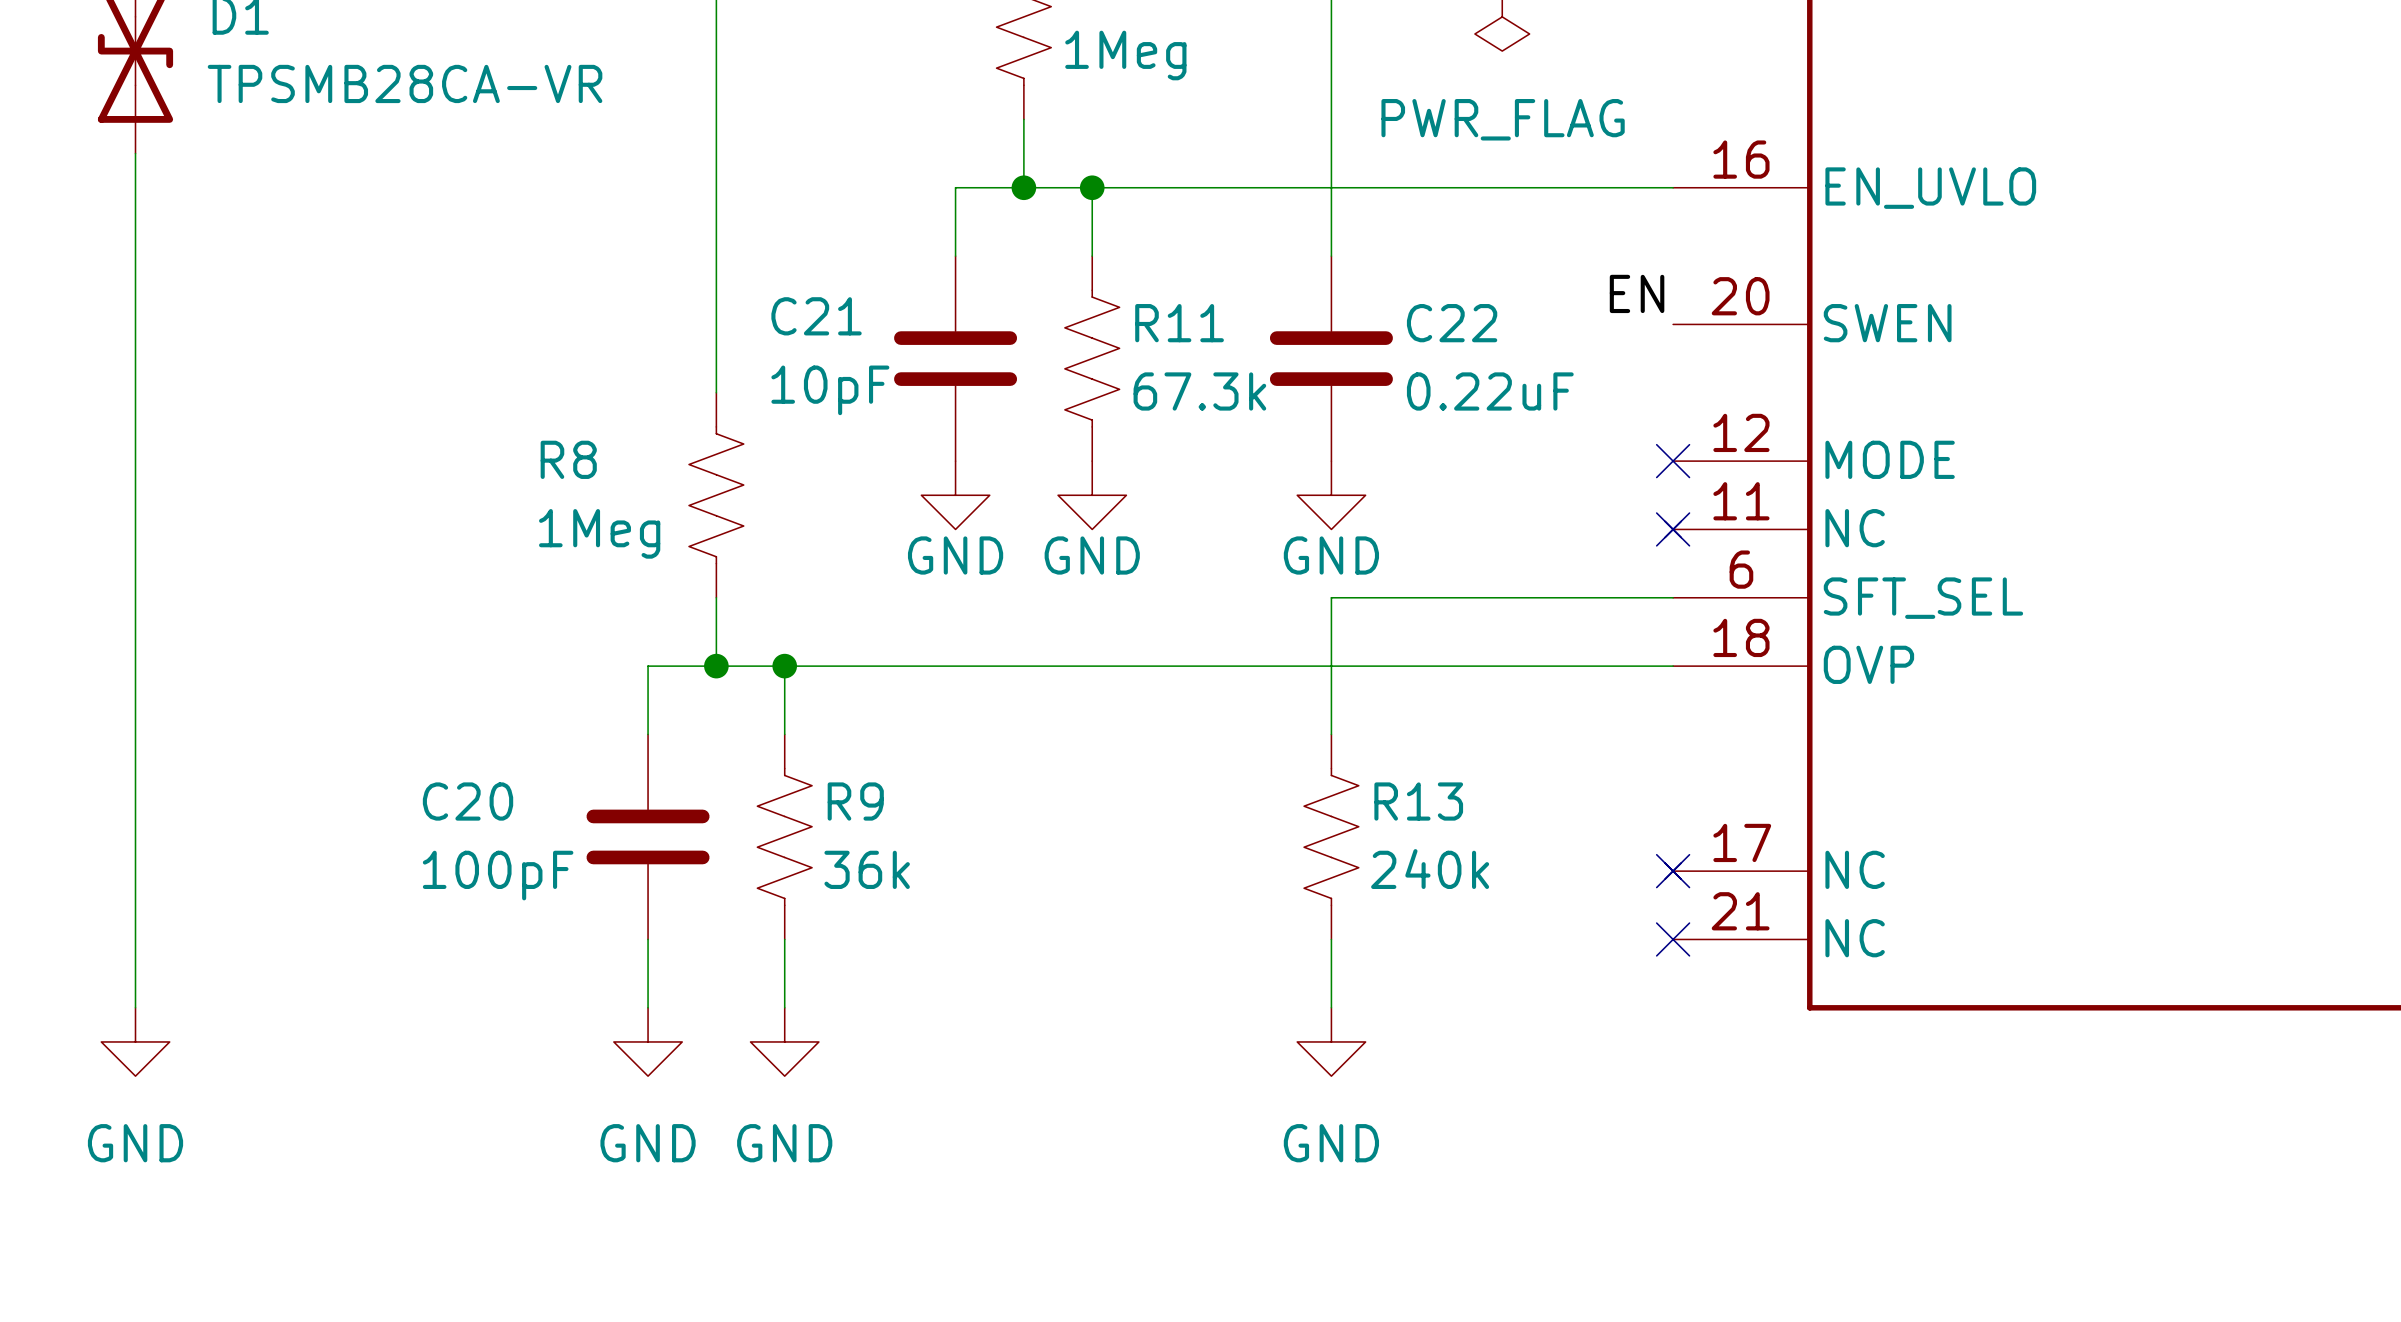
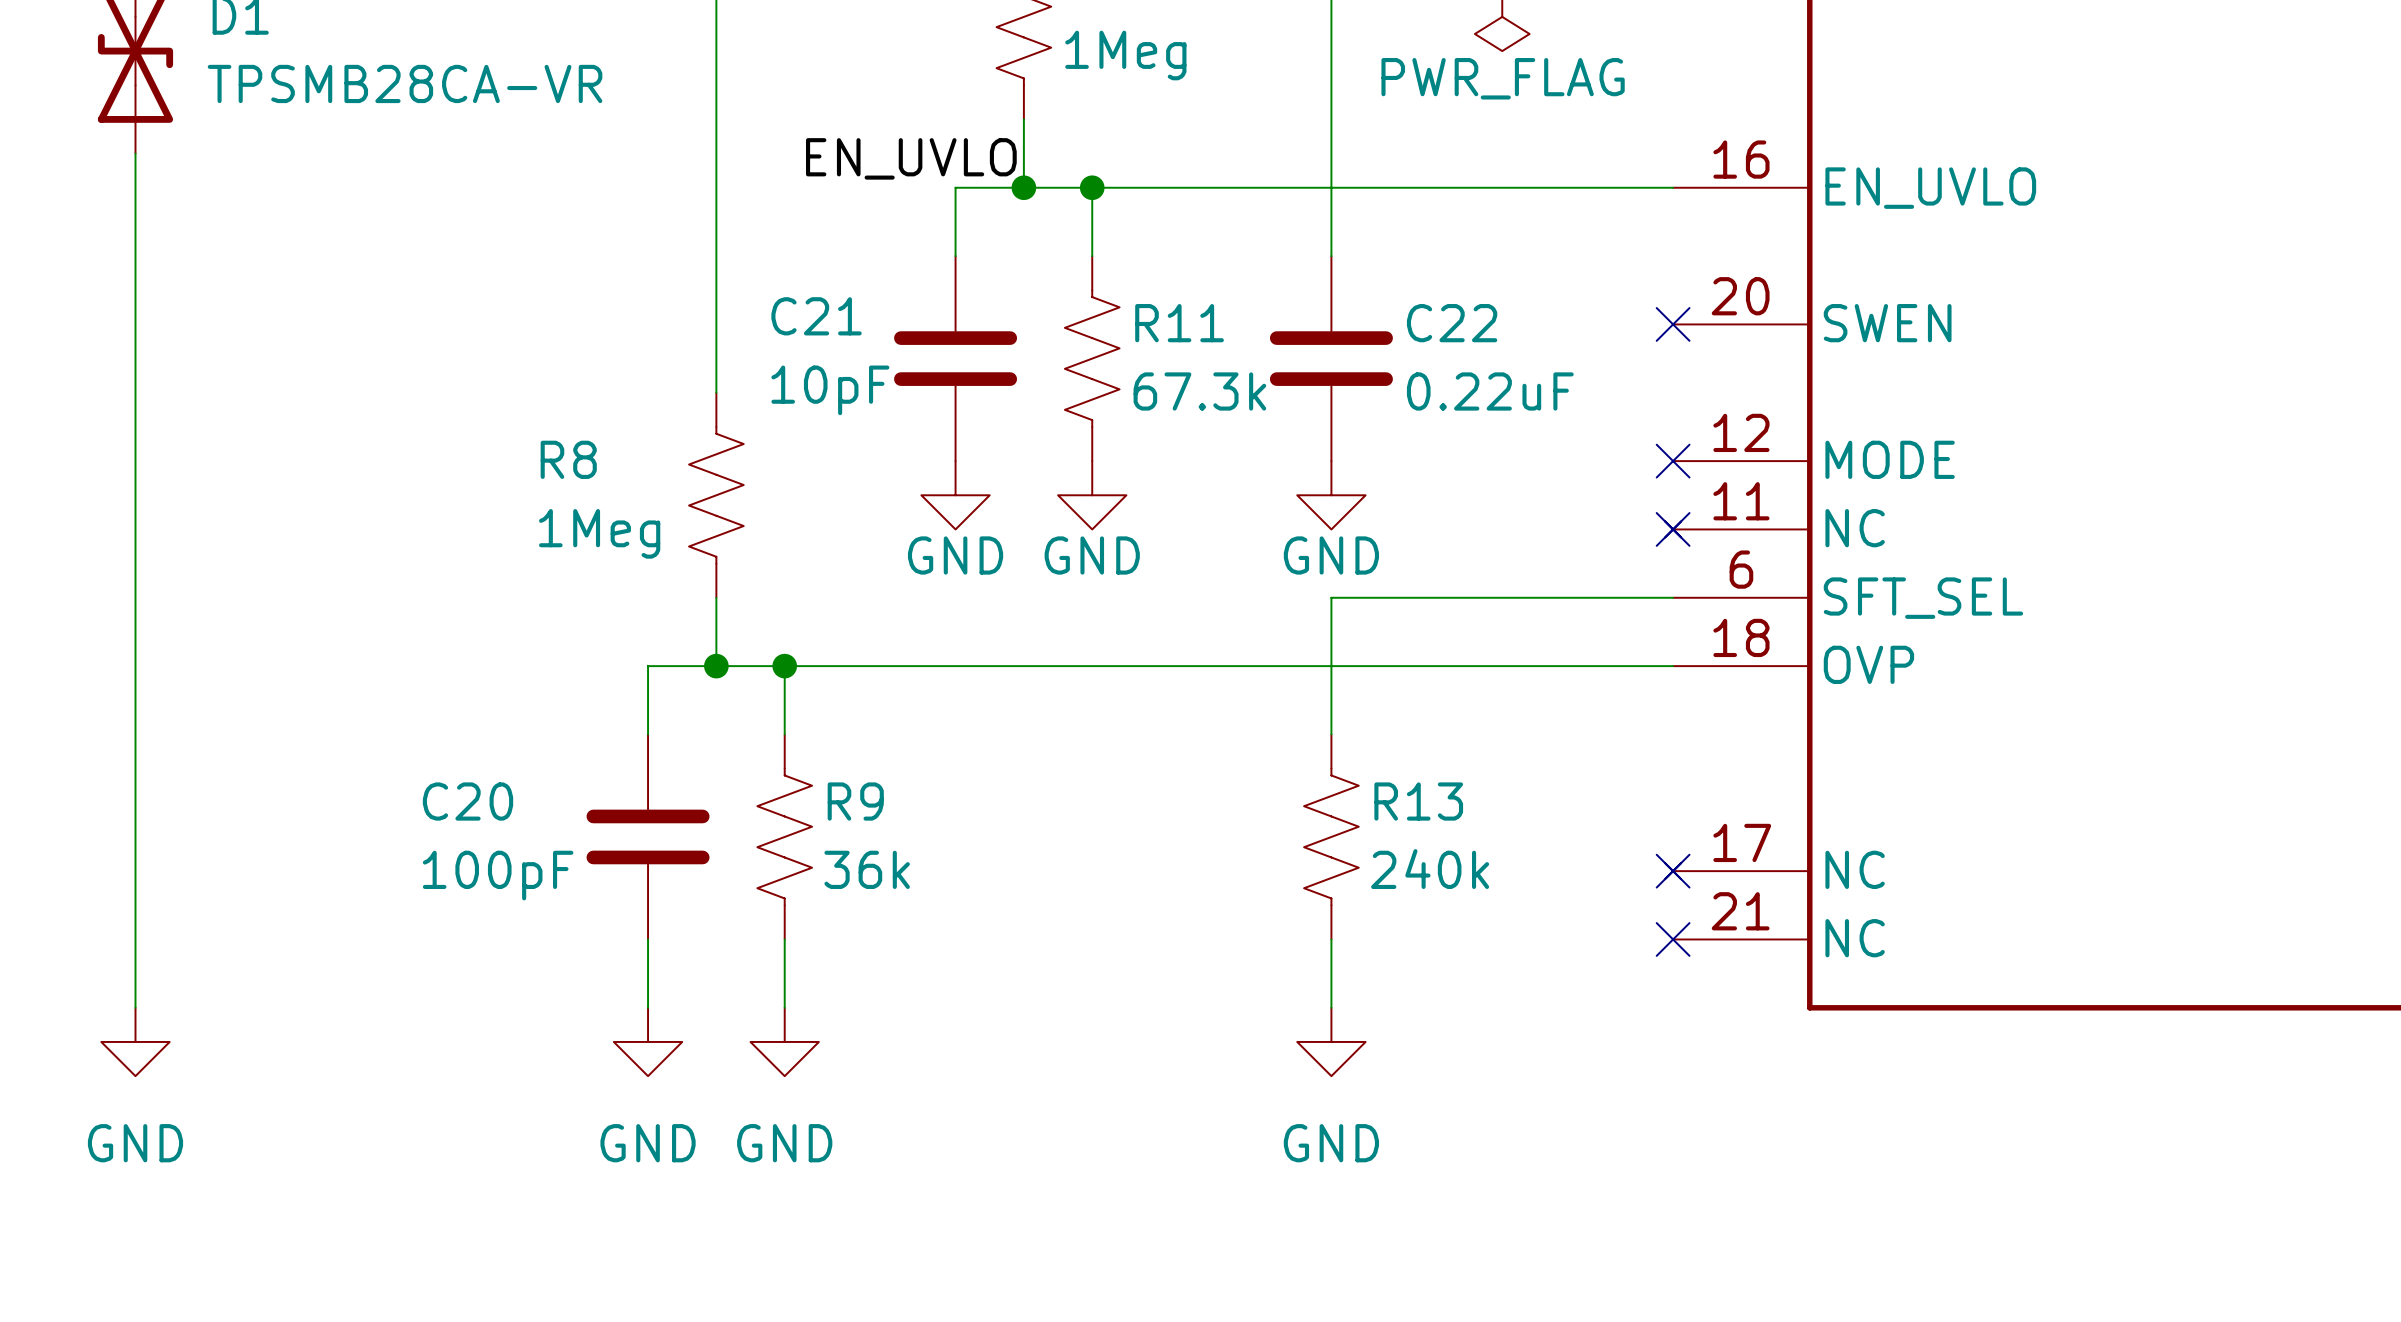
power symbol text position: PWR_FLAG (1503, 119) -> PWR_FLAG (1503, 78)
label: none -> EN_UVLO (911, 158)
label: EN (1637, 293) -> none
no-connect mark: none -> (1673, 324)

